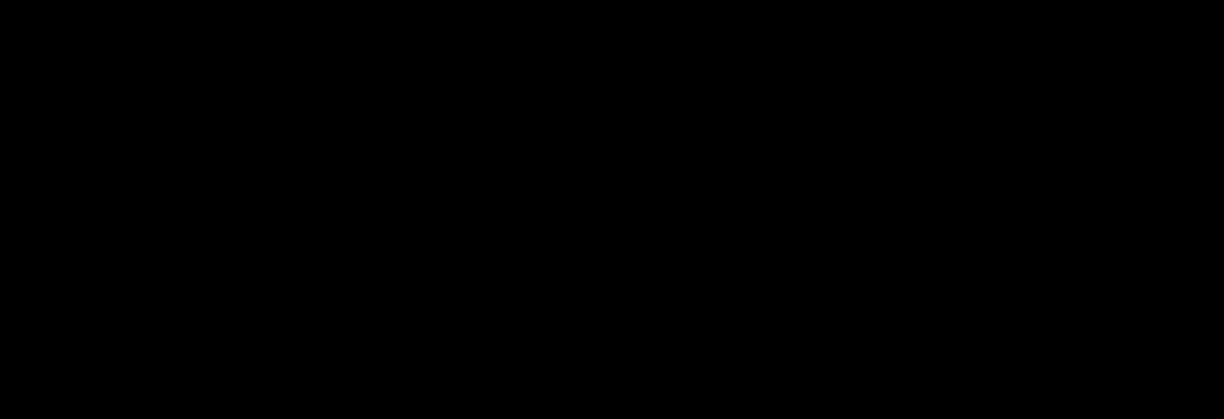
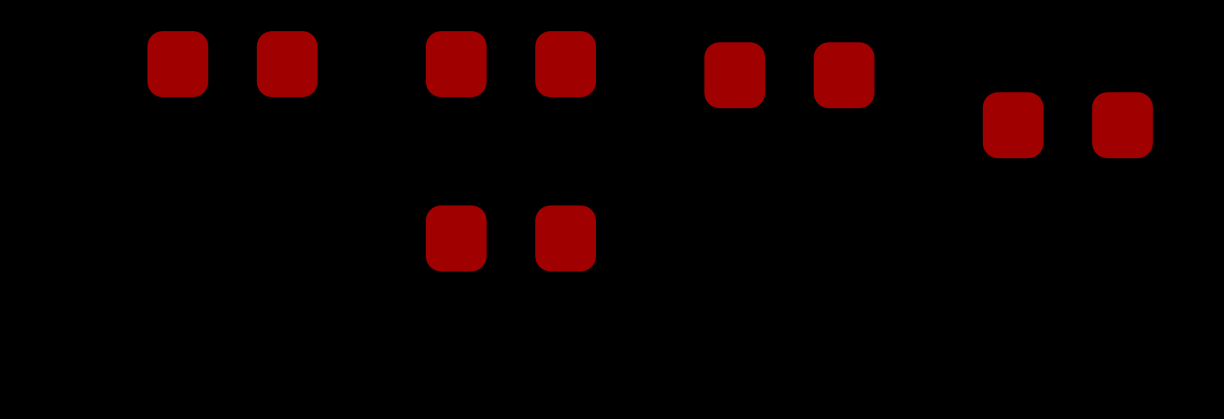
part: none -> (232, 64)
part: none -> (510, 64)
part: none -> (789, 75)
part: none -> (1067, 125)
part: none -> (510, 238)

